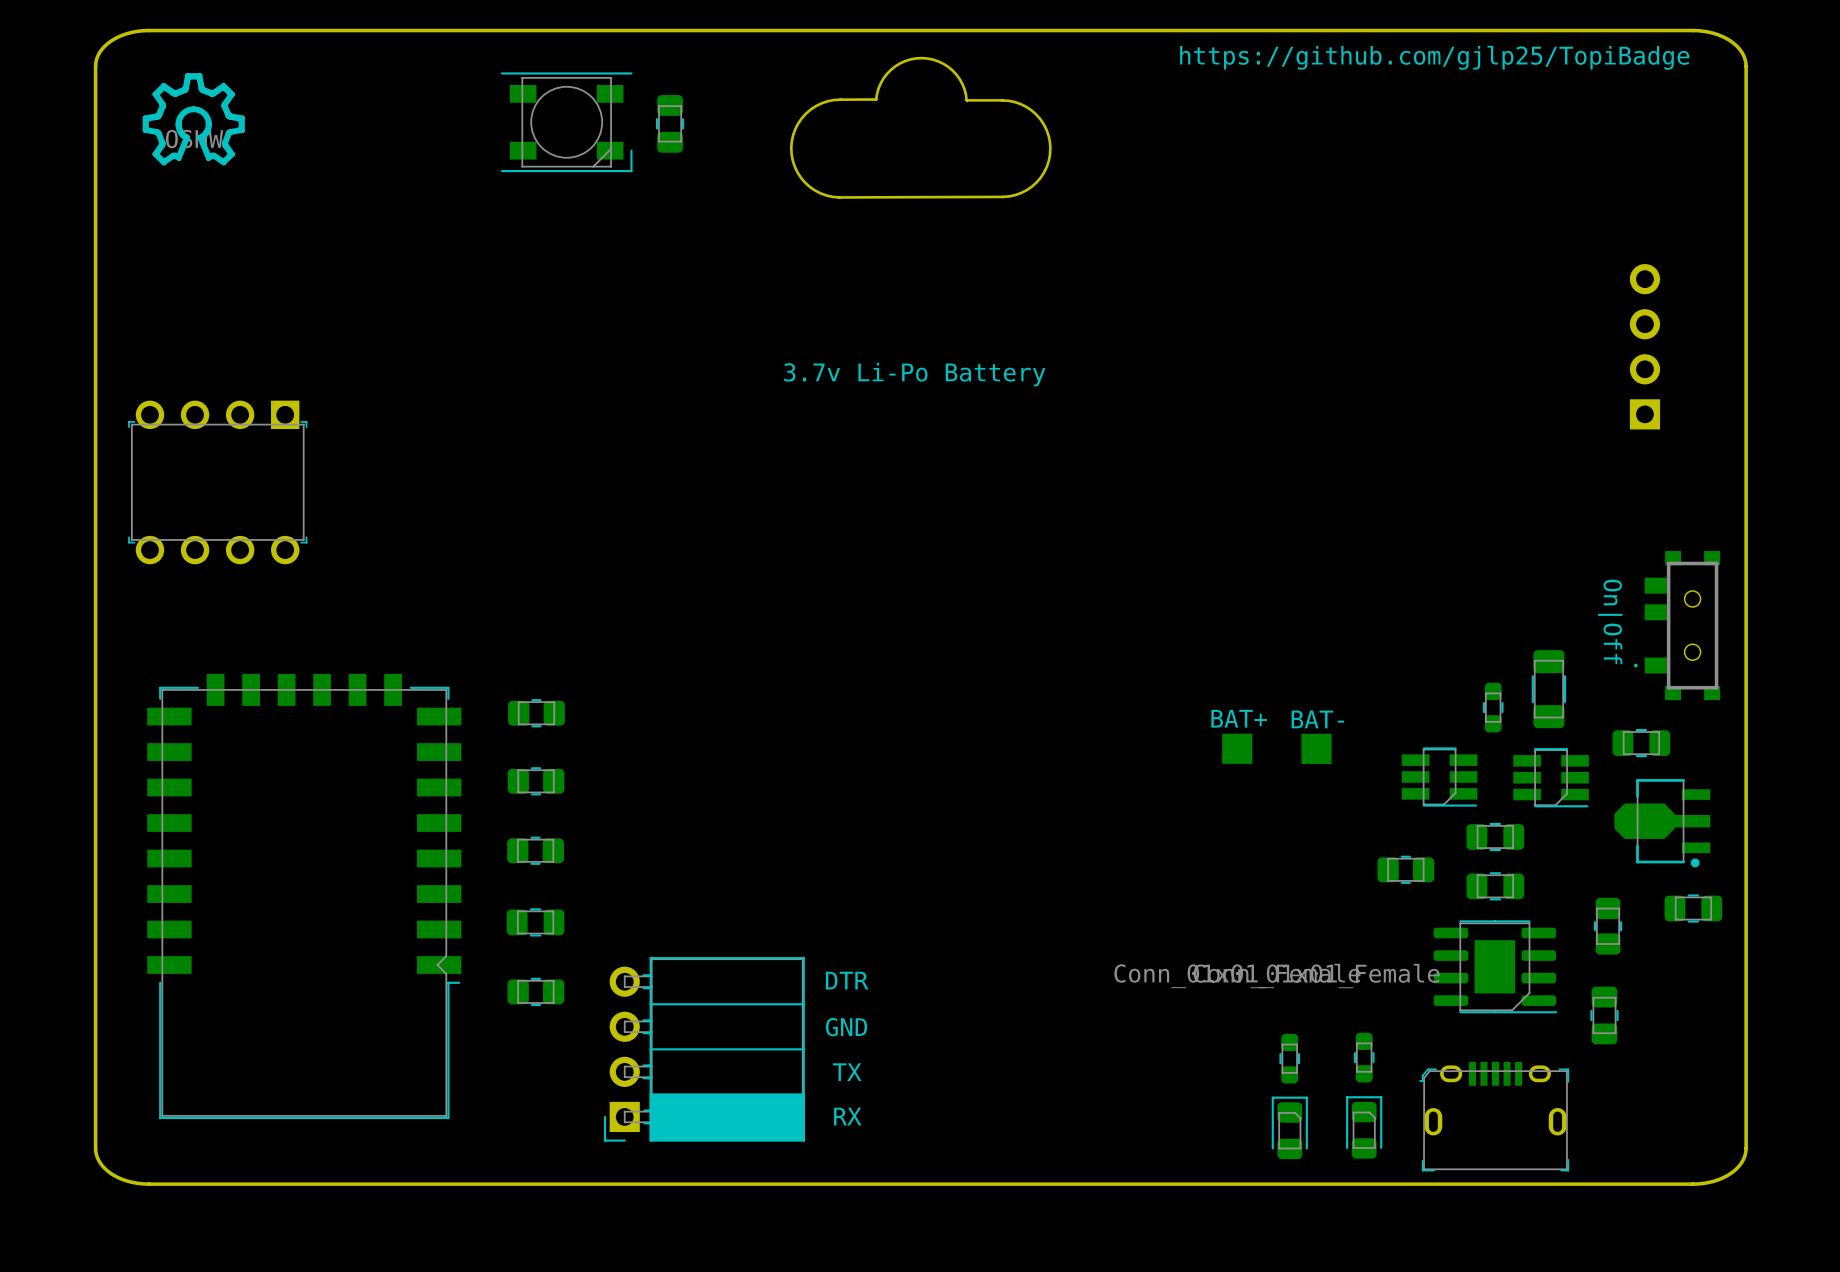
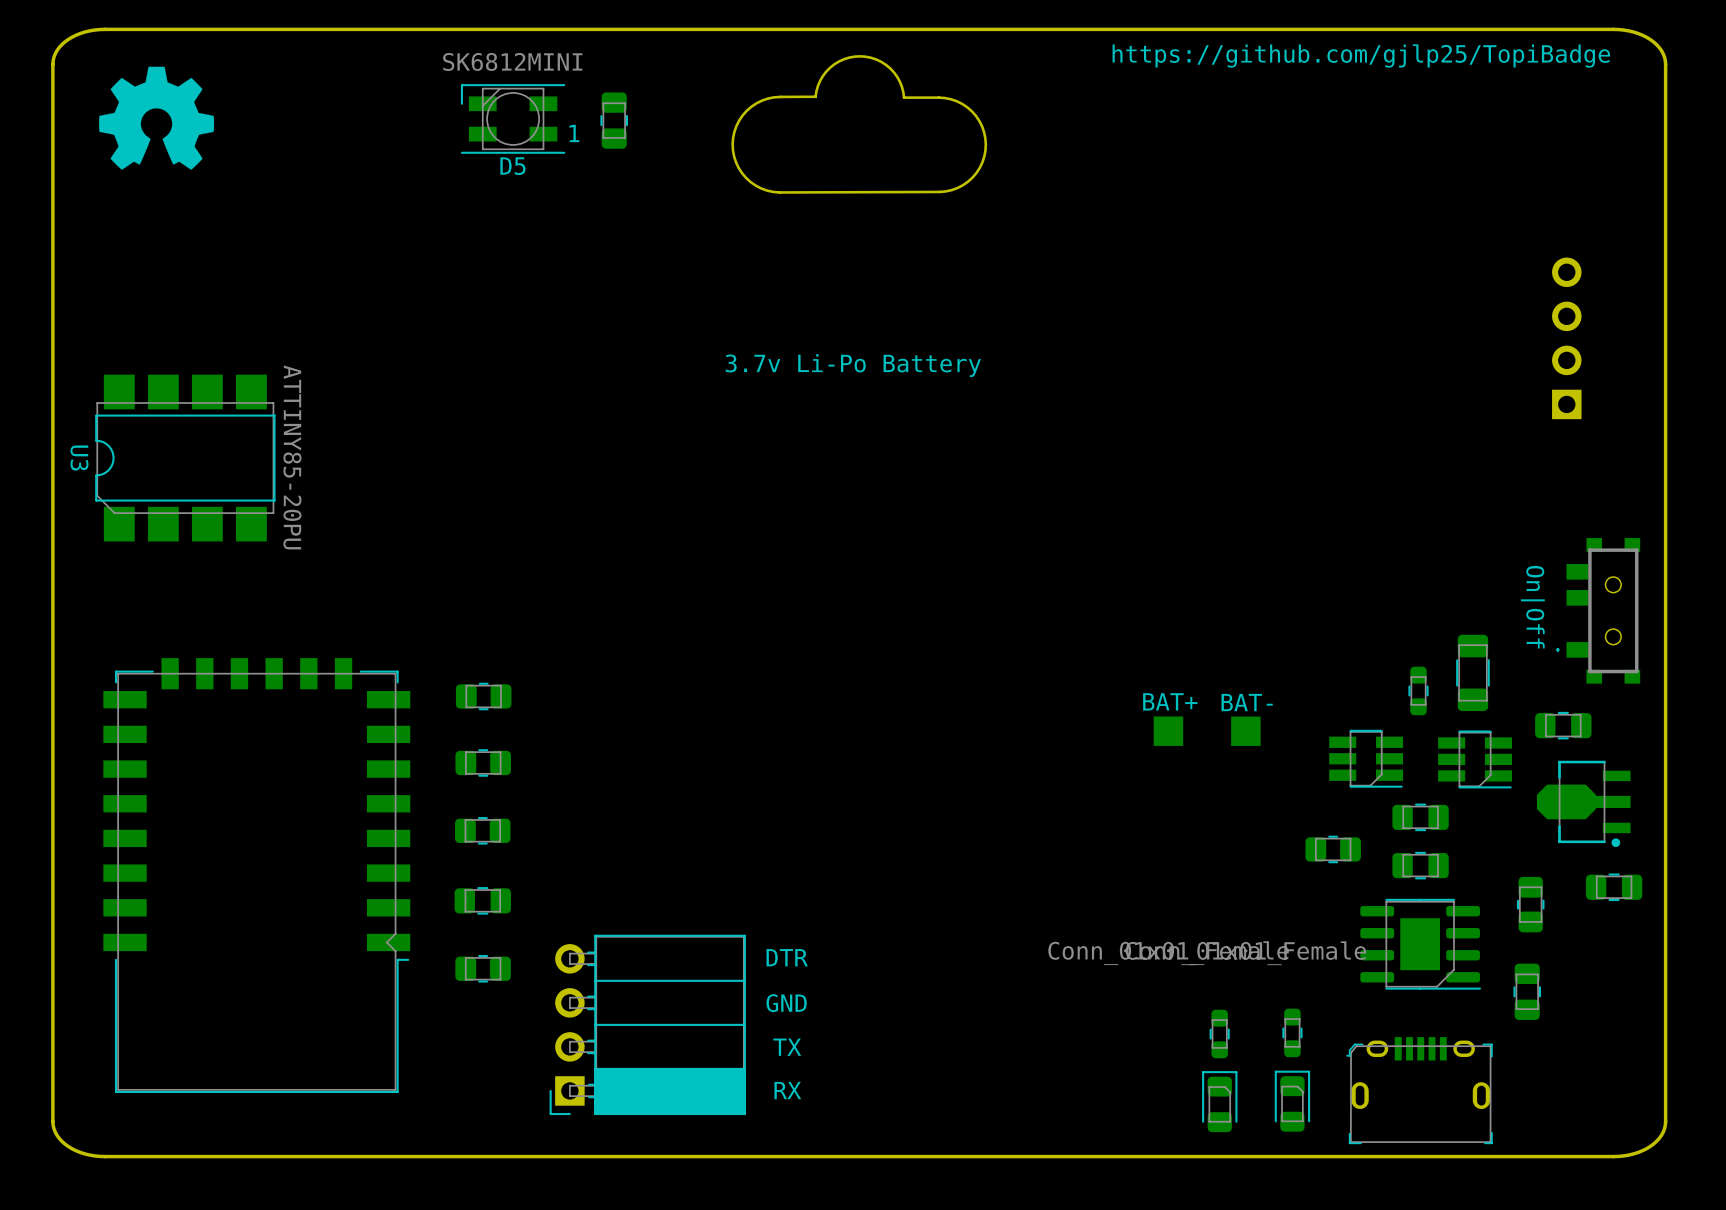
drawing shape: [142, 73, 245, 166] -> [99, 66, 215, 170]
part: (566, 122) -> none
D5: none -> SK6812MINI (513, 118)
U3: none -> ATTINY85-20PU (185, 458)
part: (217, 482) -> none

